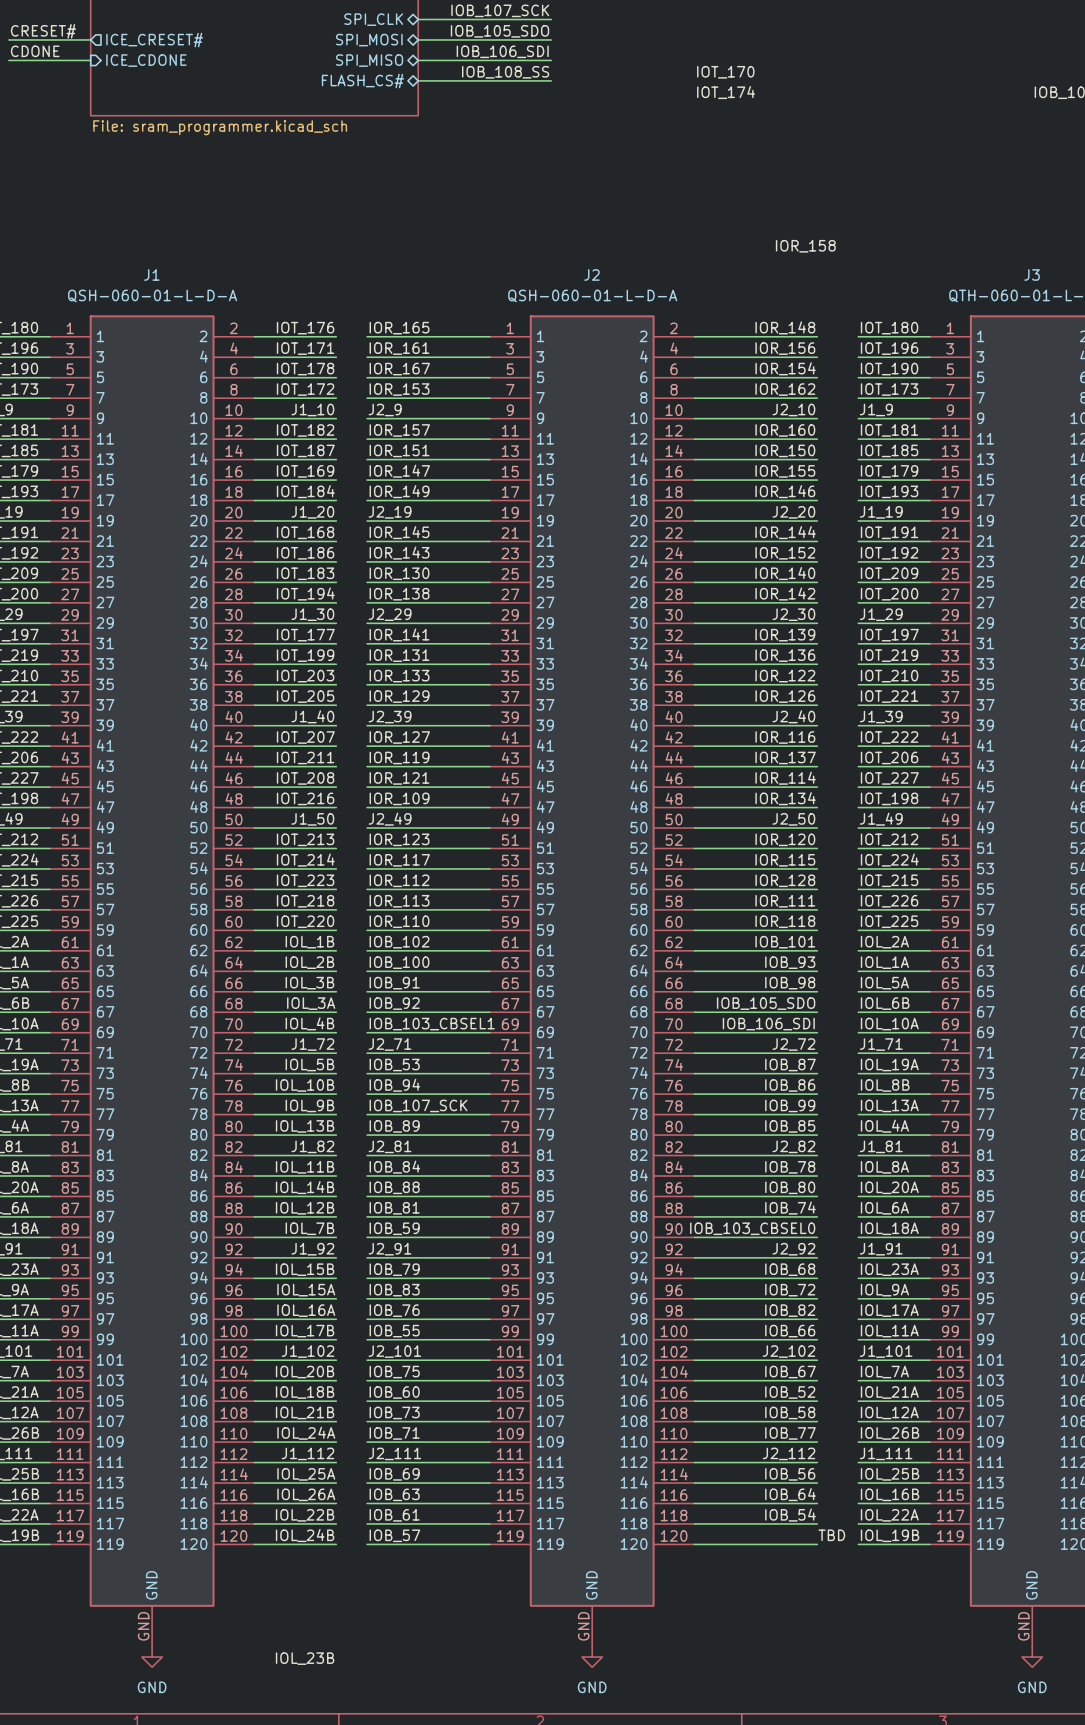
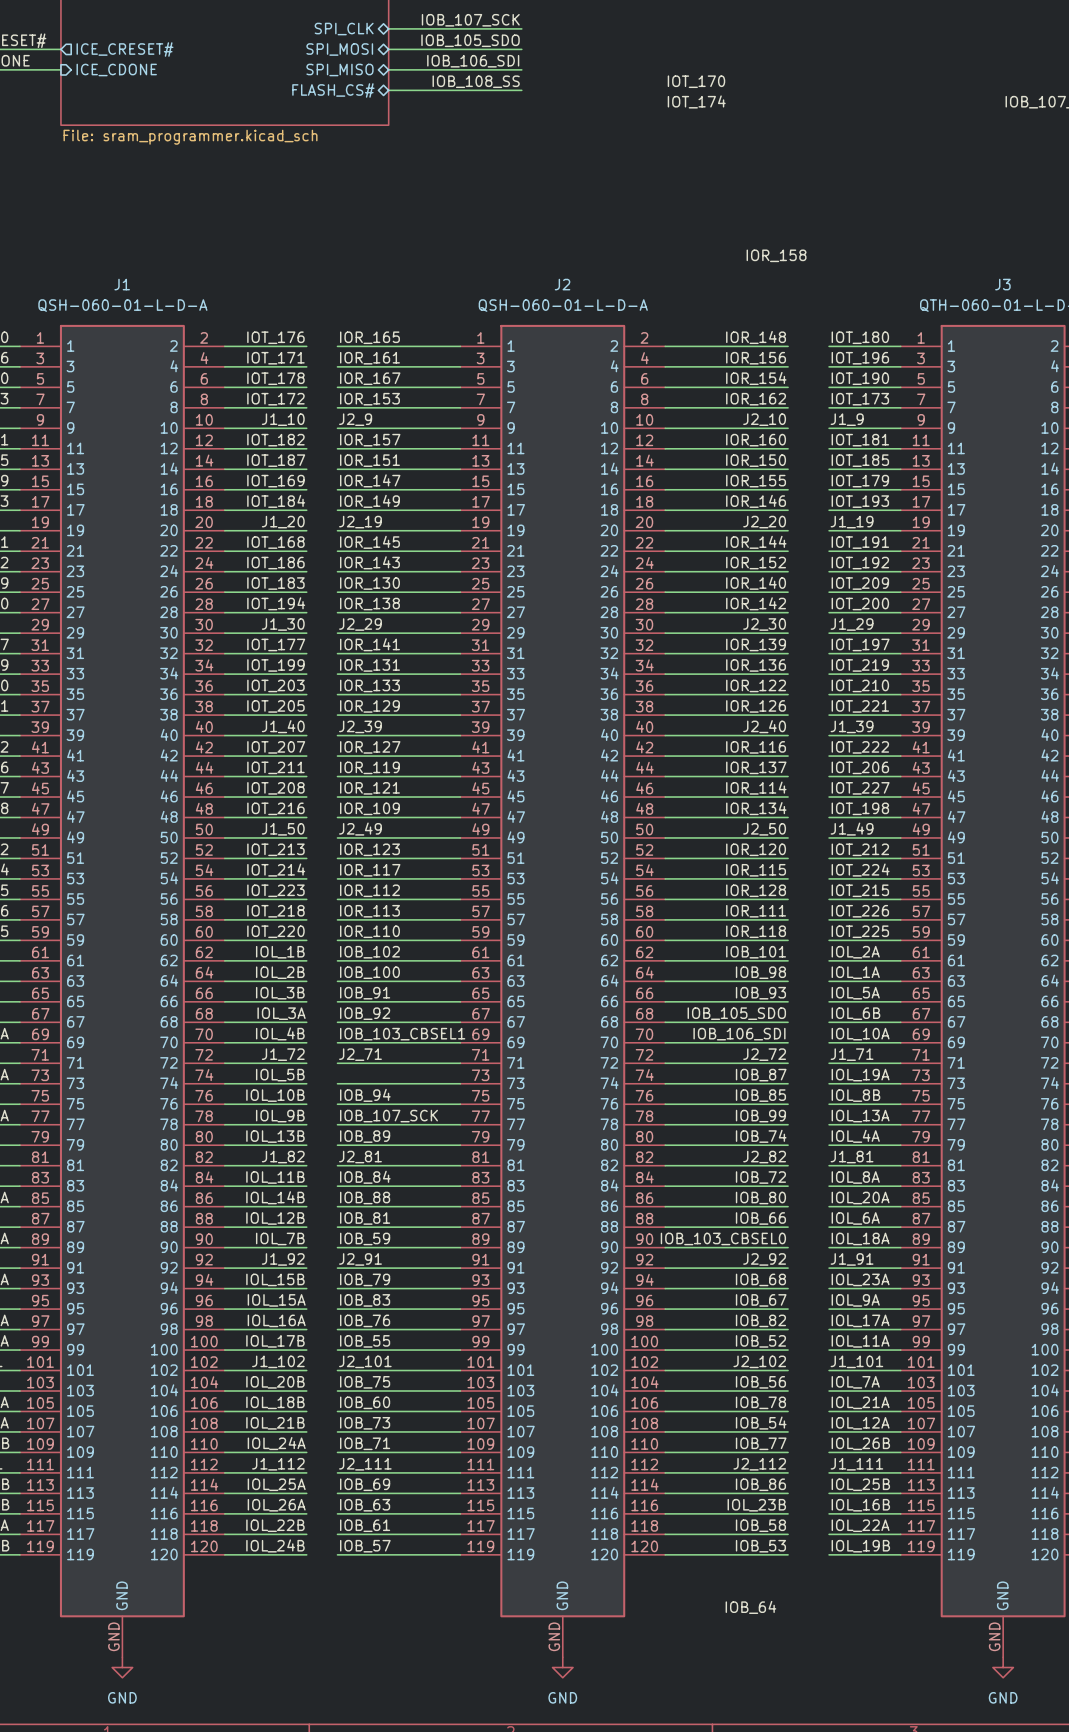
label: IOB_93 (790, 962) -> IOB_98 (760, 972)
label: IOB_98 (790, 983) -> IOB_93 (760, 993)
label: IOB_53 (394, 1065) -> none
label: IOB_86 (790, 1085) -> IOB_85 (760, 1095)
label: IOB_85 (790, 1126) -> IOB_74 (761, 1136)
label: IOB_78 (790, 1167) -> IOB_72 (760, 1177)
label: IOB_74 (790, 1208) -> IOB_66 (760, 1218)
label: IOB_72 (790, 1290) -> IOB_67 (761, 1300)
label: IOB_66 (790, 1331) -> IOB_52 (760, 1341)
label: IOB_67 (790, 1372) -> IOB_56 (760, 1382)
label: IOB_52 (790, 1392) -> IOB_78 (760, 1402)
label: IOB_58 (790, 1412) -> IOB_54 (761, 1423)
label: IOB_56 (790, 1474) -> IOB_86 (760, 1484)
label: IOB_64 (790, 1494) -> IOL_23B (756, 1505)
label: IOB_54 (790, 1515) -> IOB_58 (760, 1525)
label: TBD (831, 1535) -> IOB_53 (760, 1546)
label: none -> IOB_64 (750, 1607)
label: IOL_23B (305, 1658) -> none

